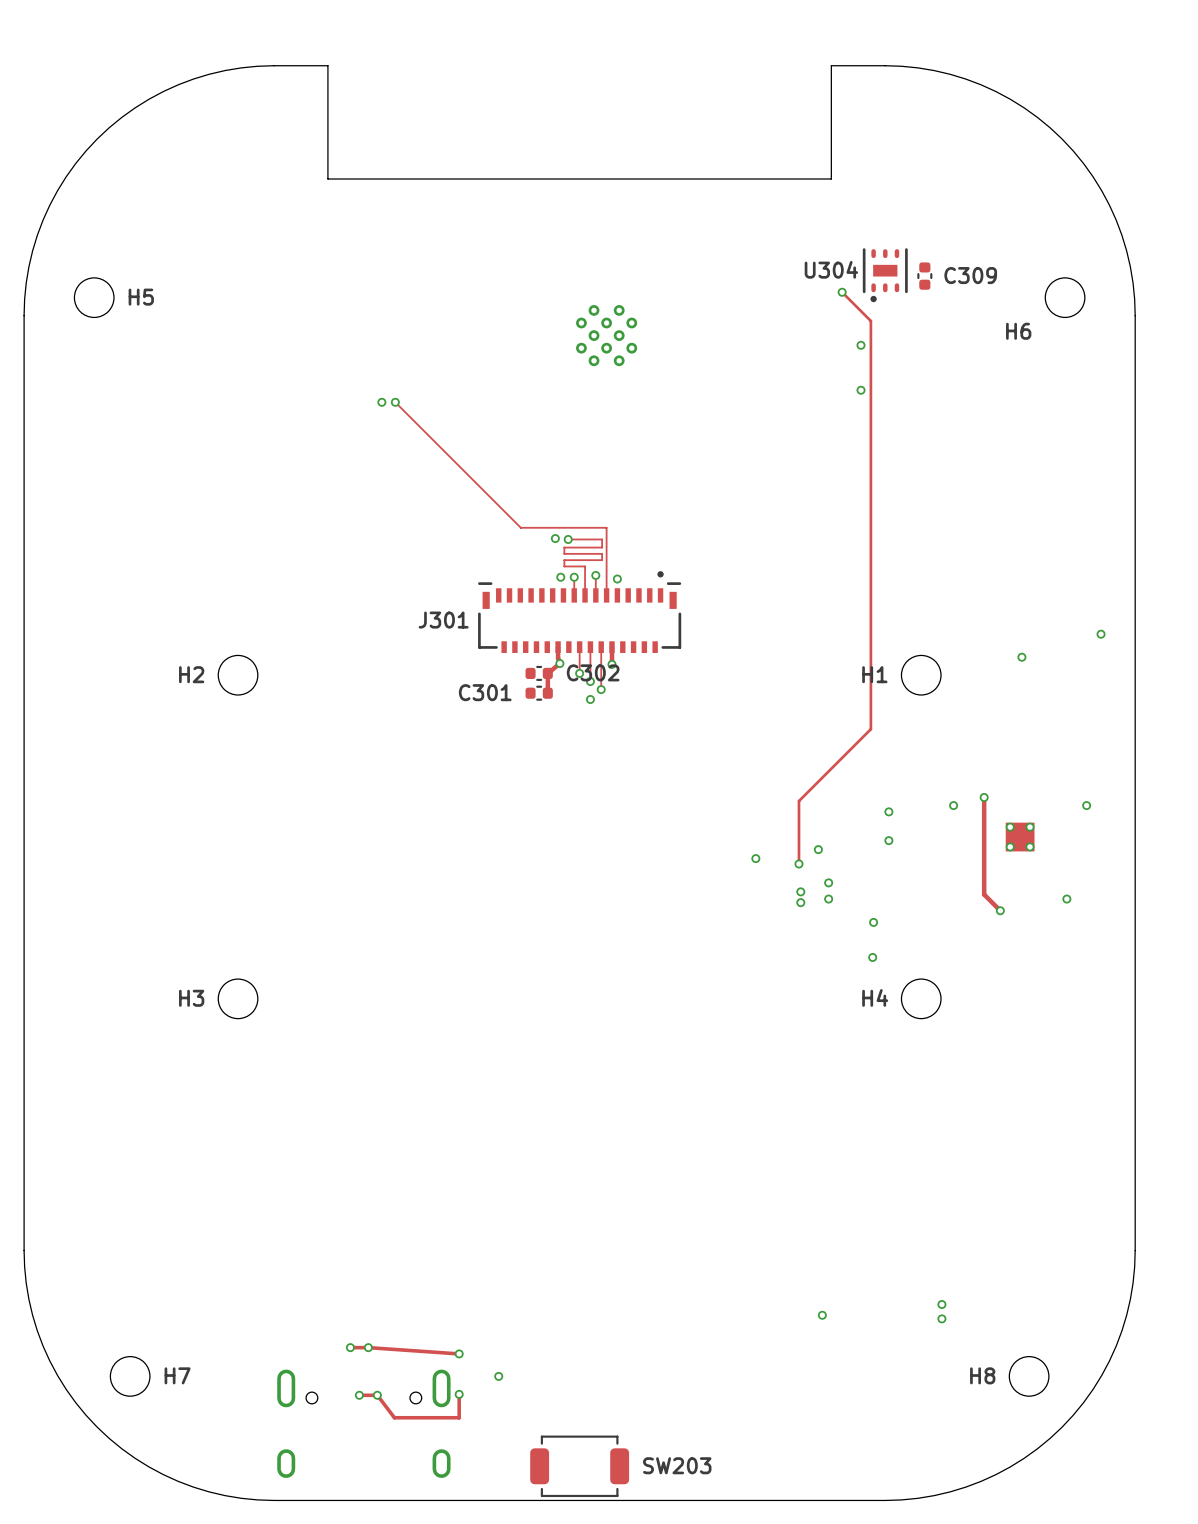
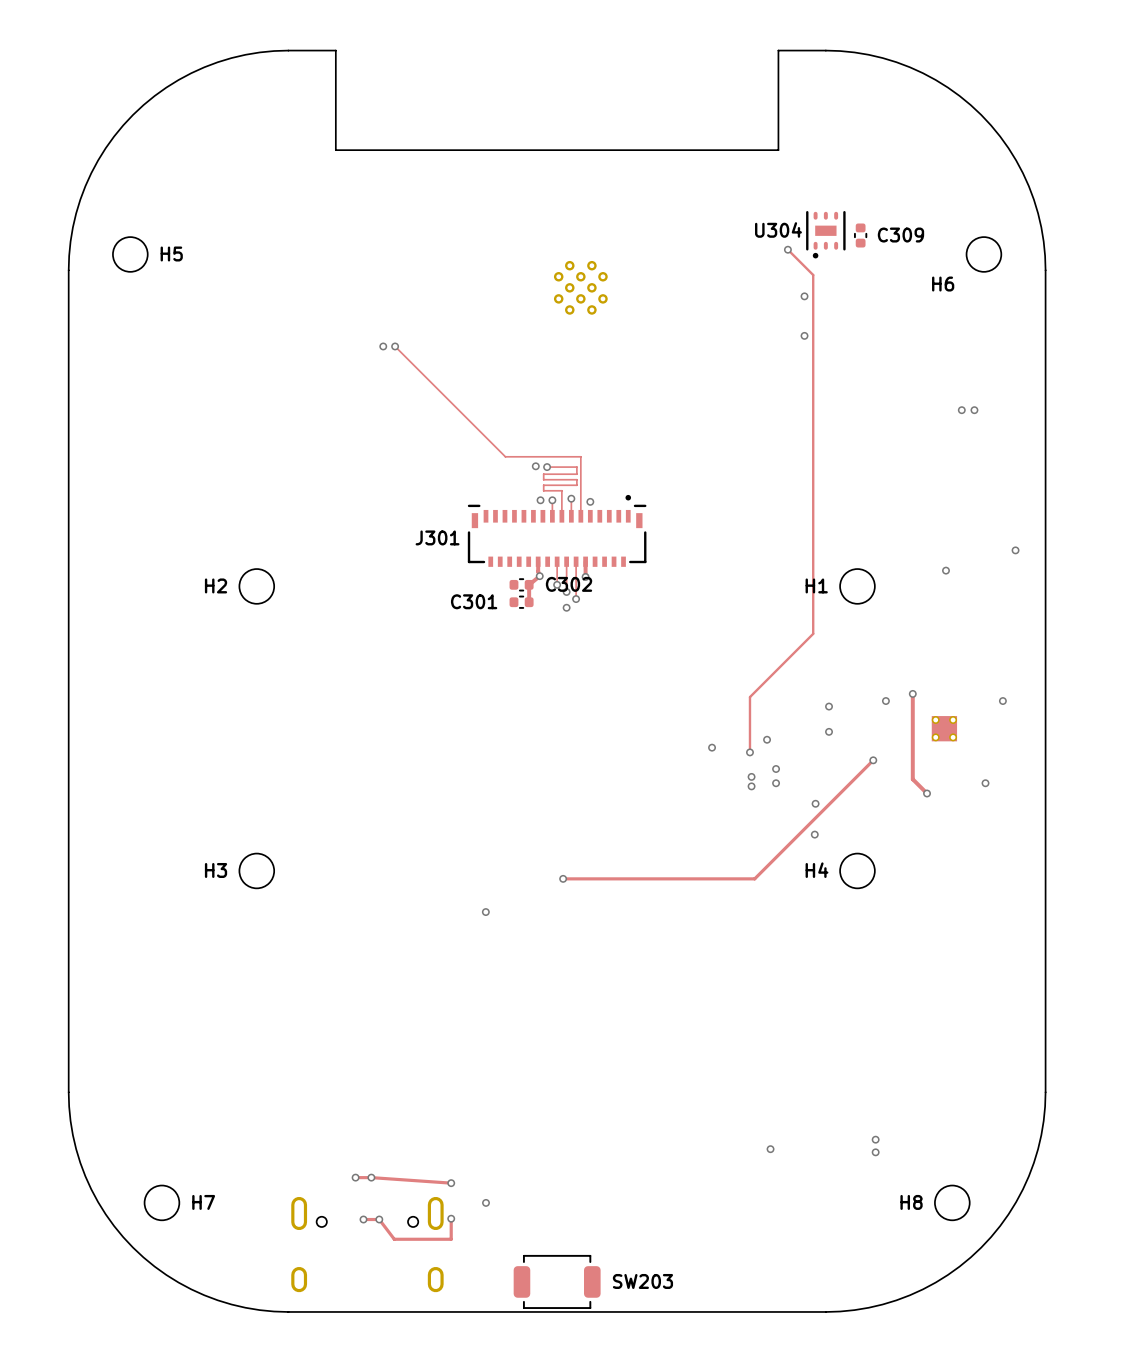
via: none -> (961, 410)
via: none -> (974, 410)
track: none -> (873, 760) (754, 878) (563, 878)
via: none -> (873, 760)
via: none -> (563, 878)
via: none -> (485, 912)

